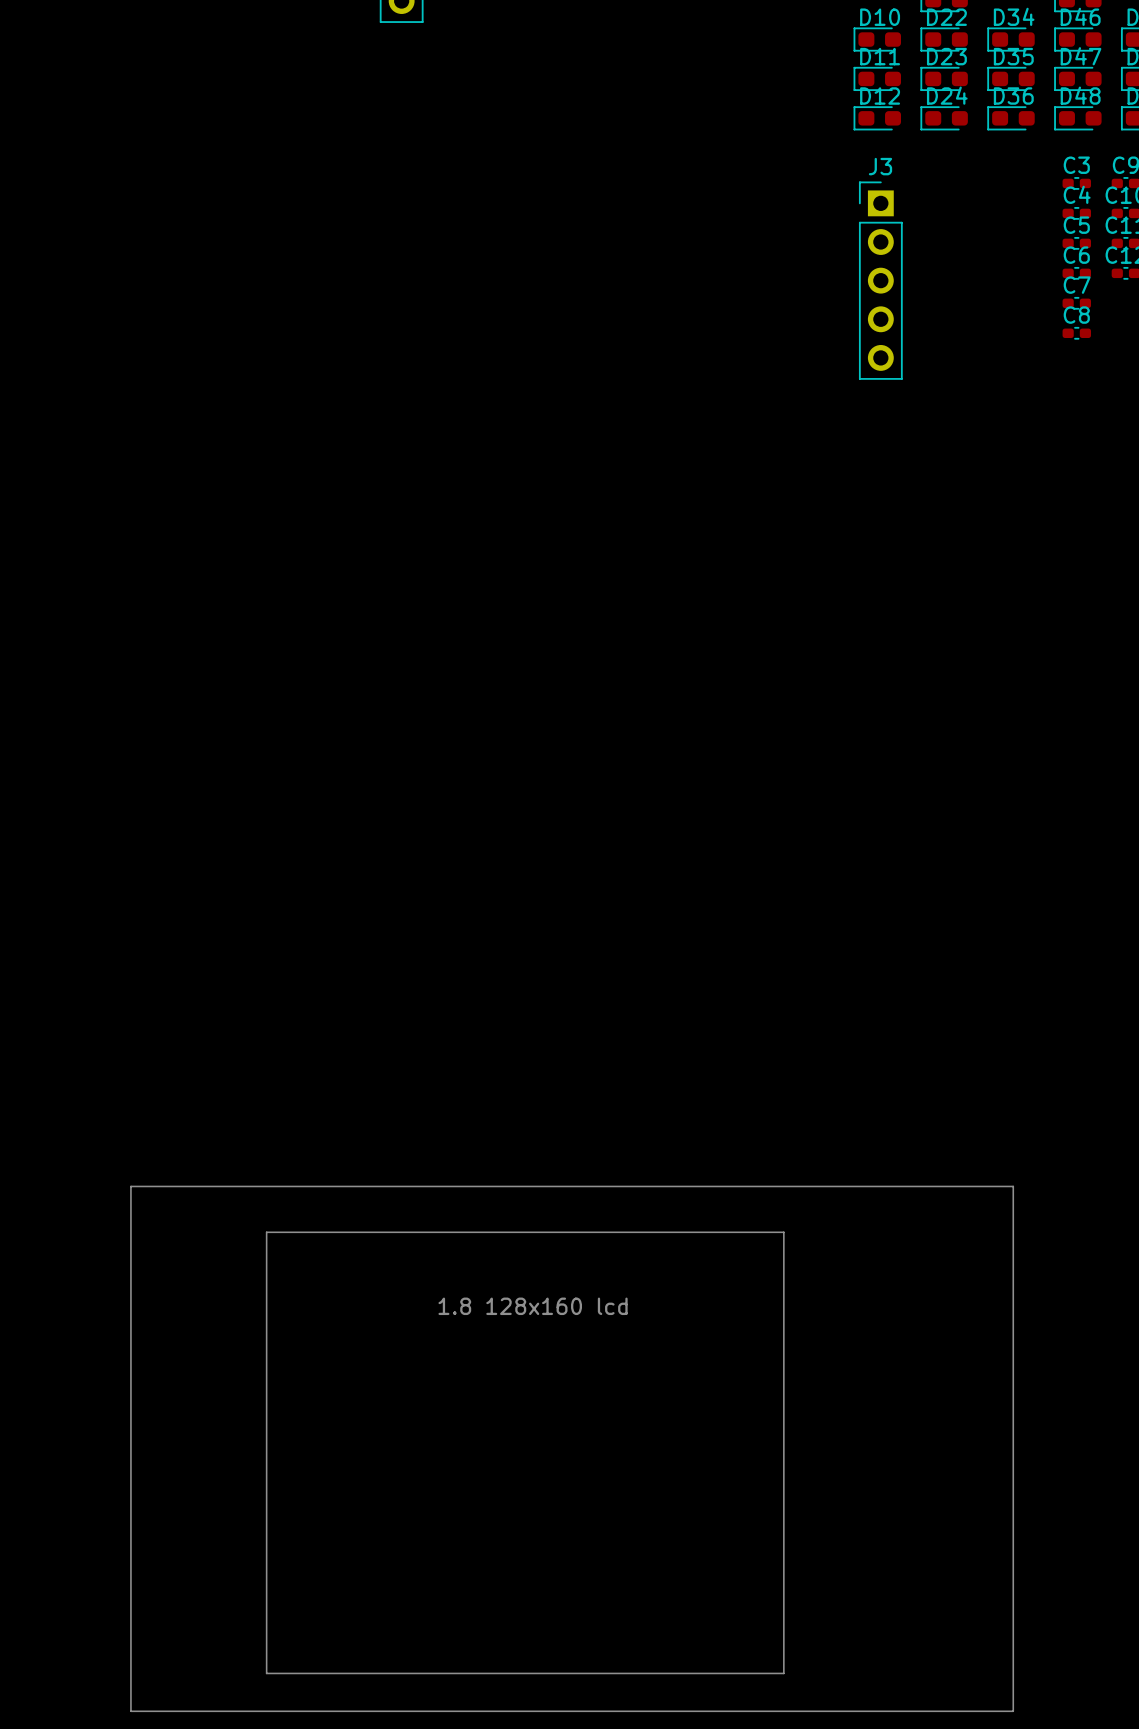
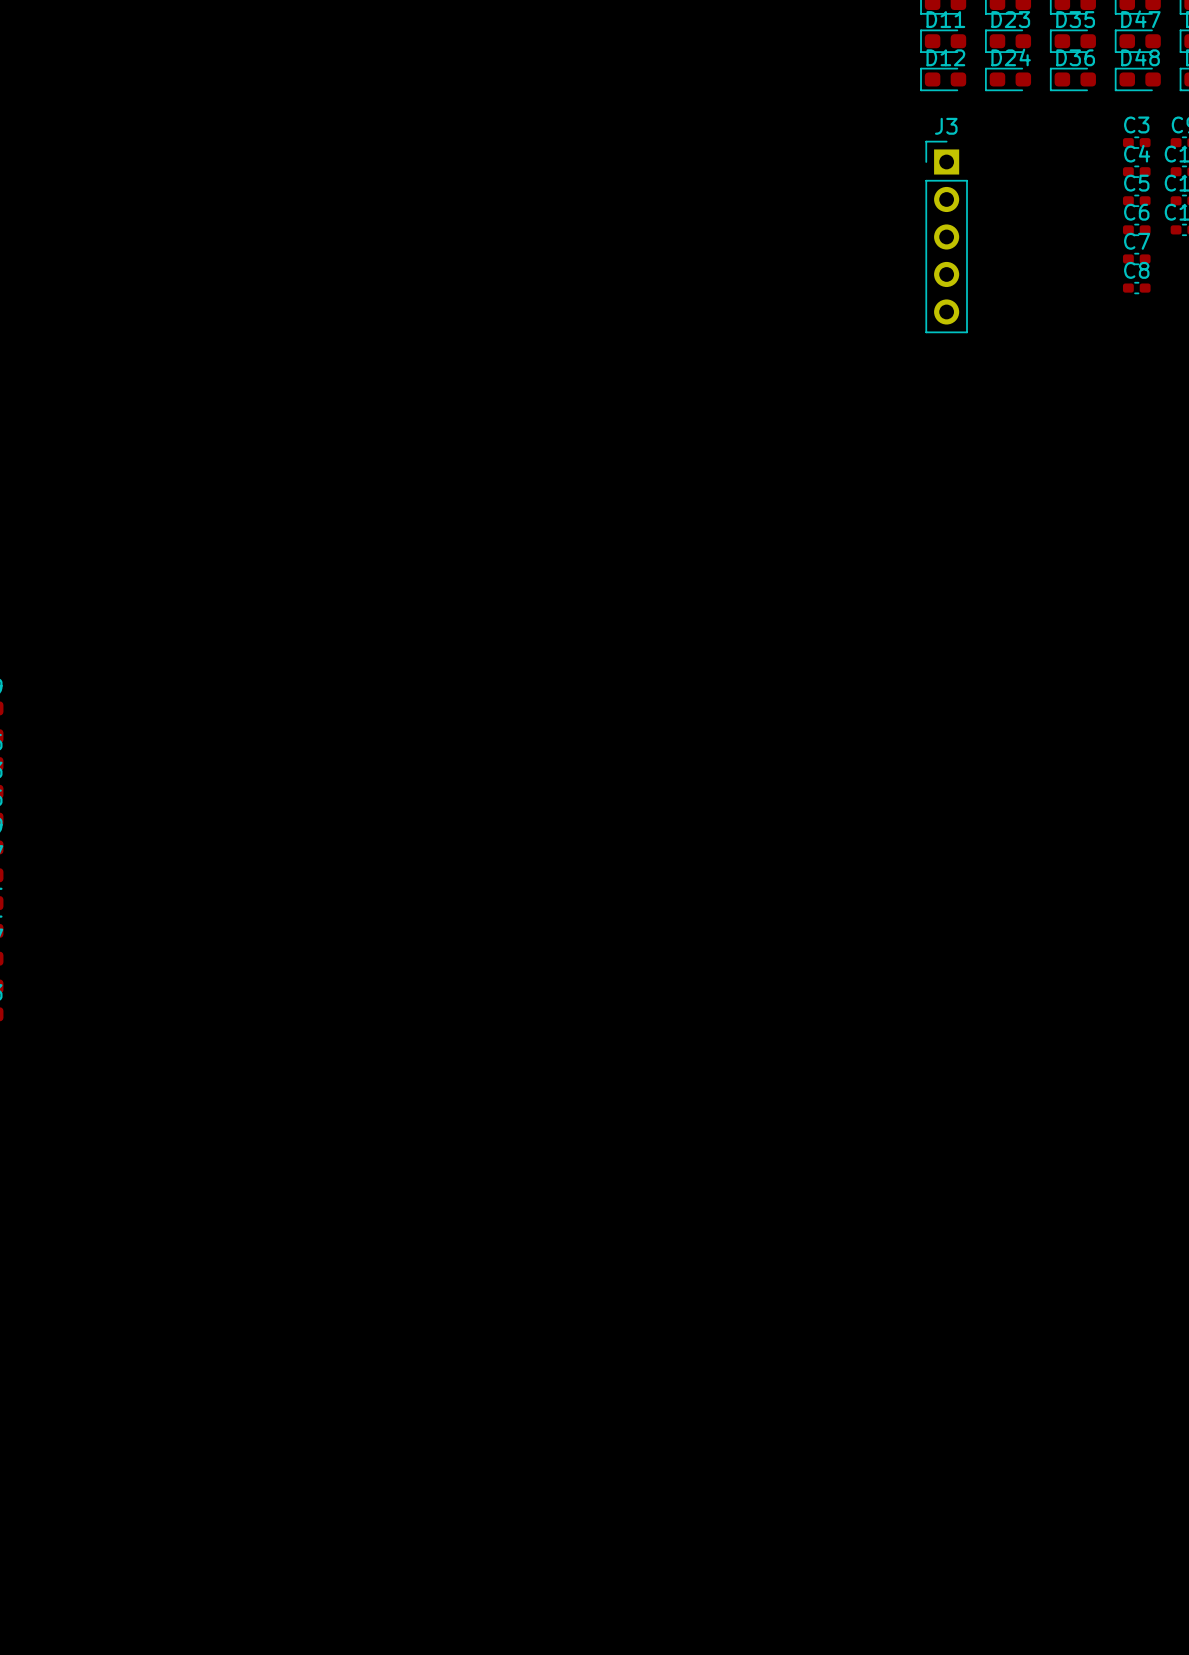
line: (130, 1186) (1013, 1186) (1013, 1711) (130, 1711) (130, 1186) -> none
line: (266, 1232) (783, 1232) (783, 1673) (266, 1673) (266, 1232) -> none
text: 1.8 128x160 lcd (533, 1306) -> none

